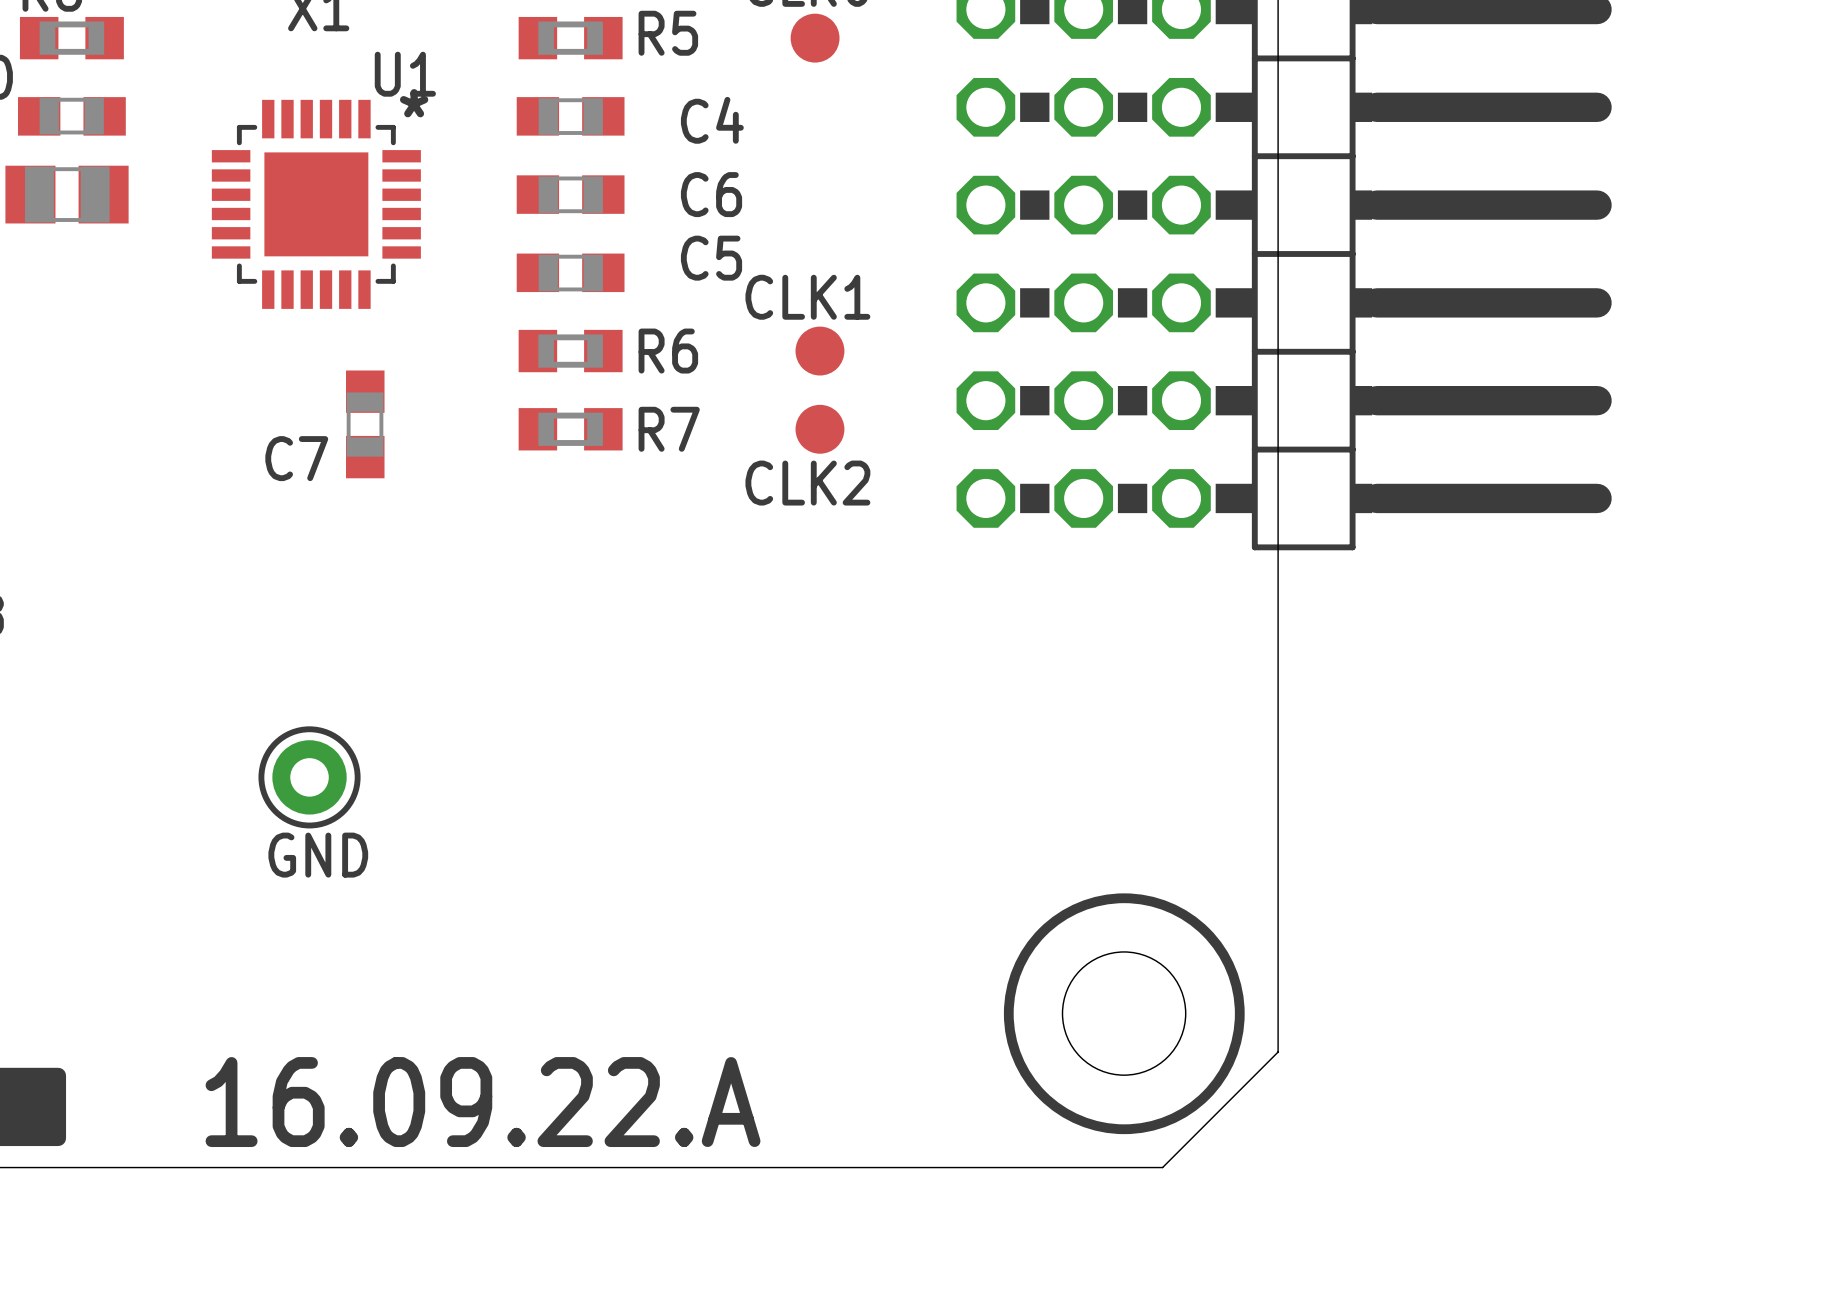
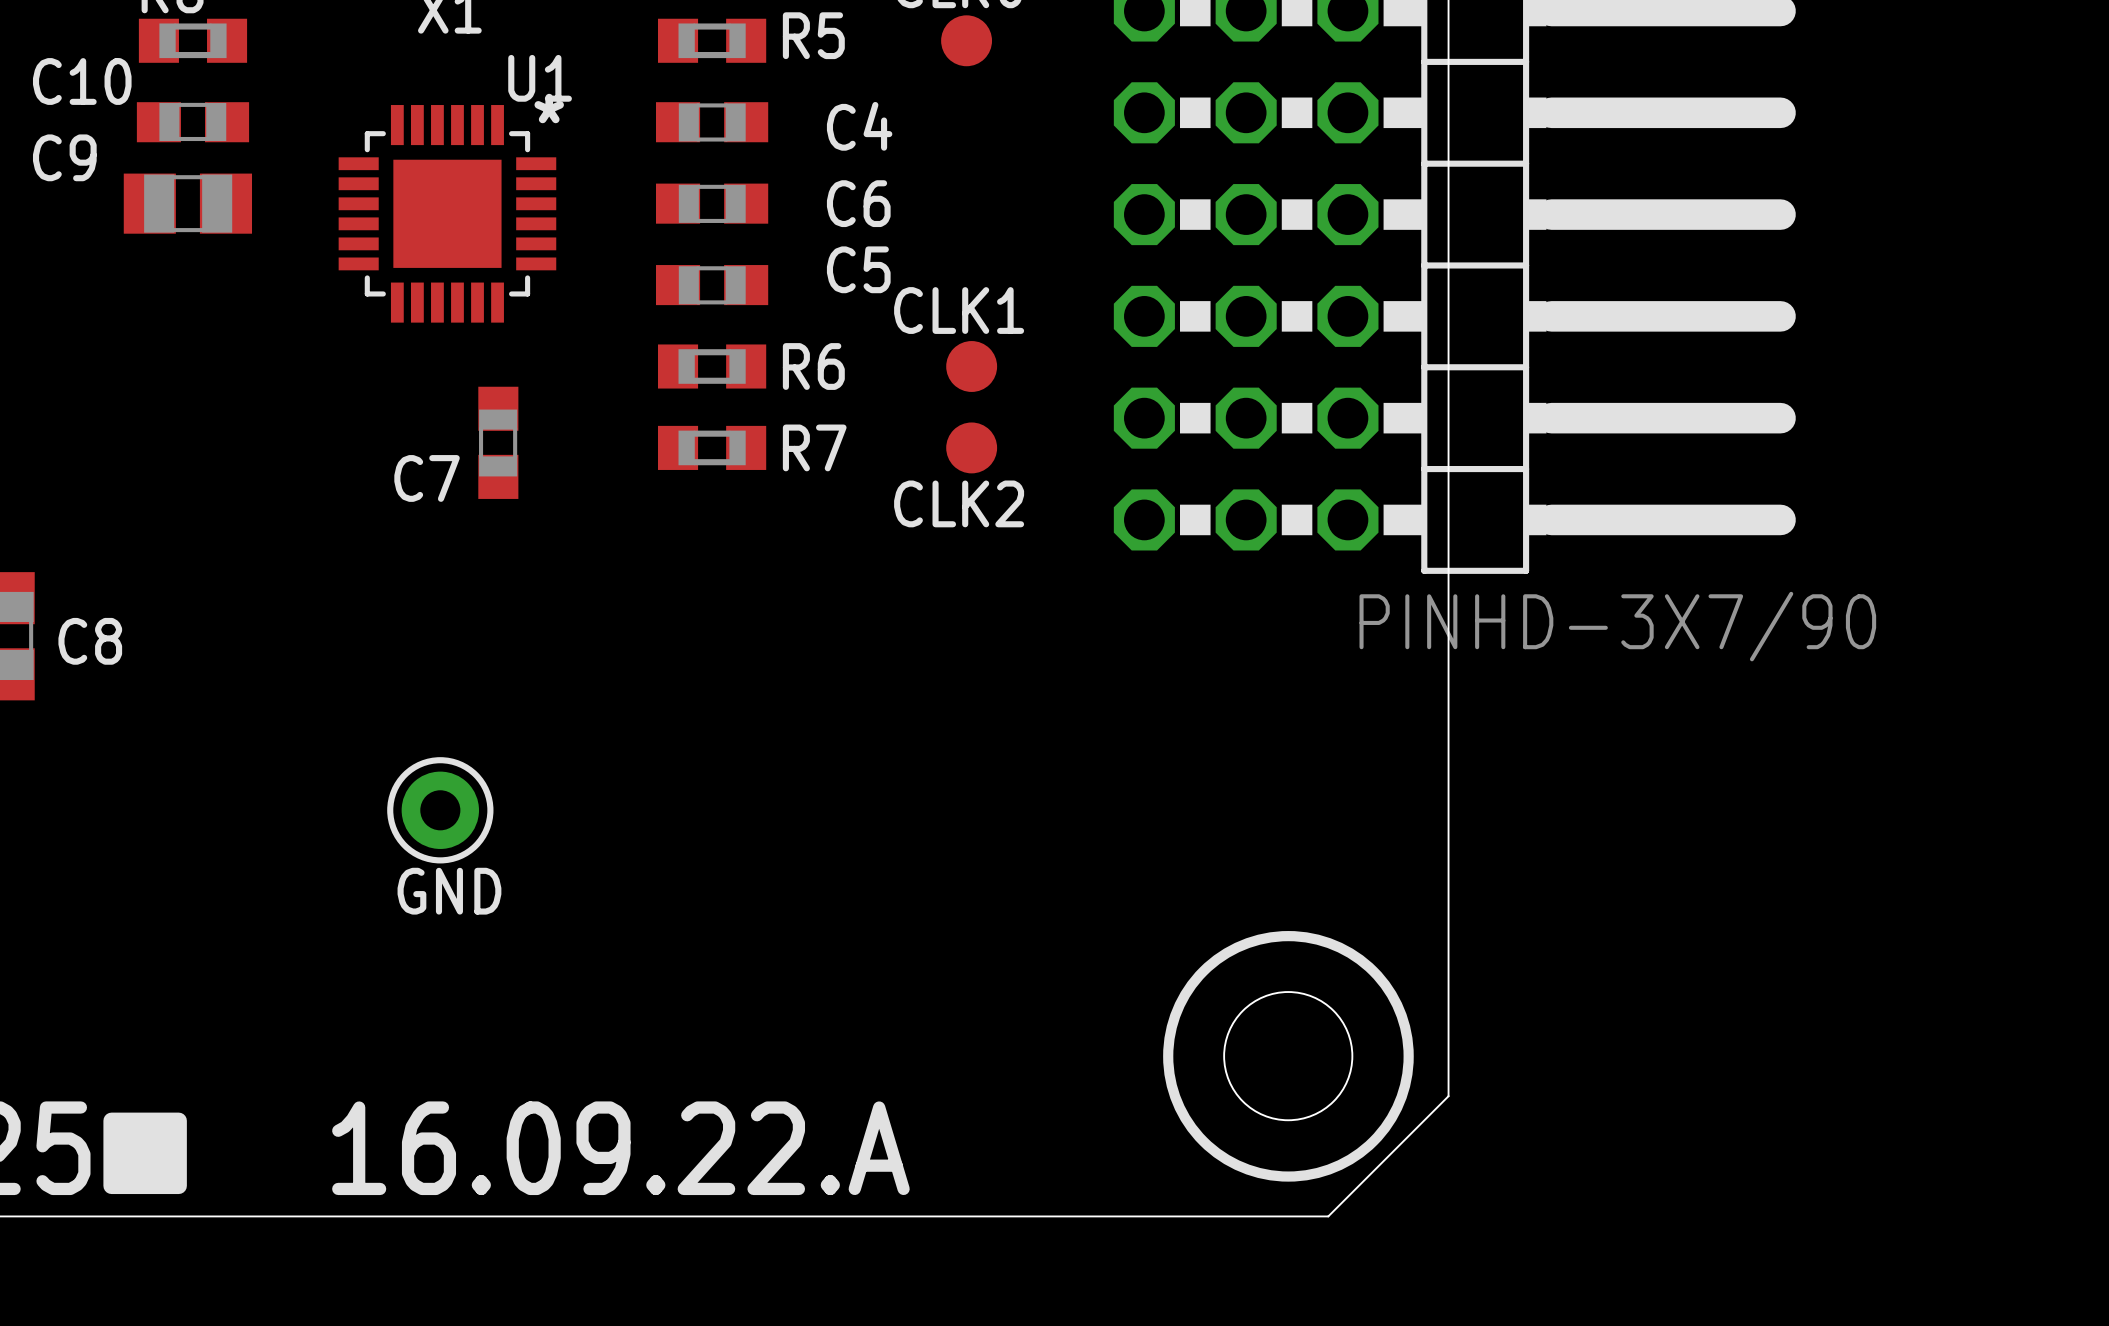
part value: none -> PINHD-3X7/90 (1617, 626)

